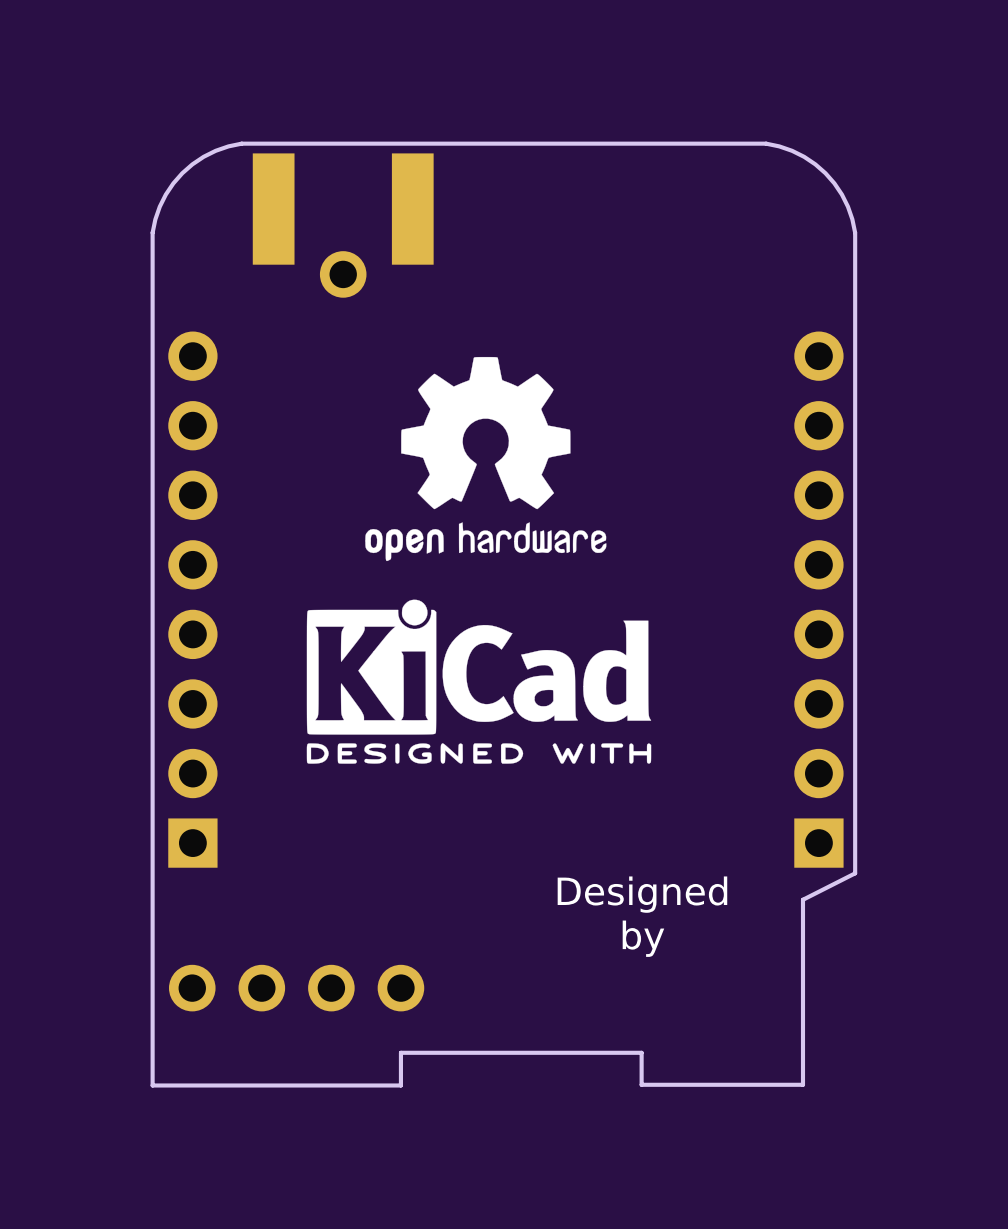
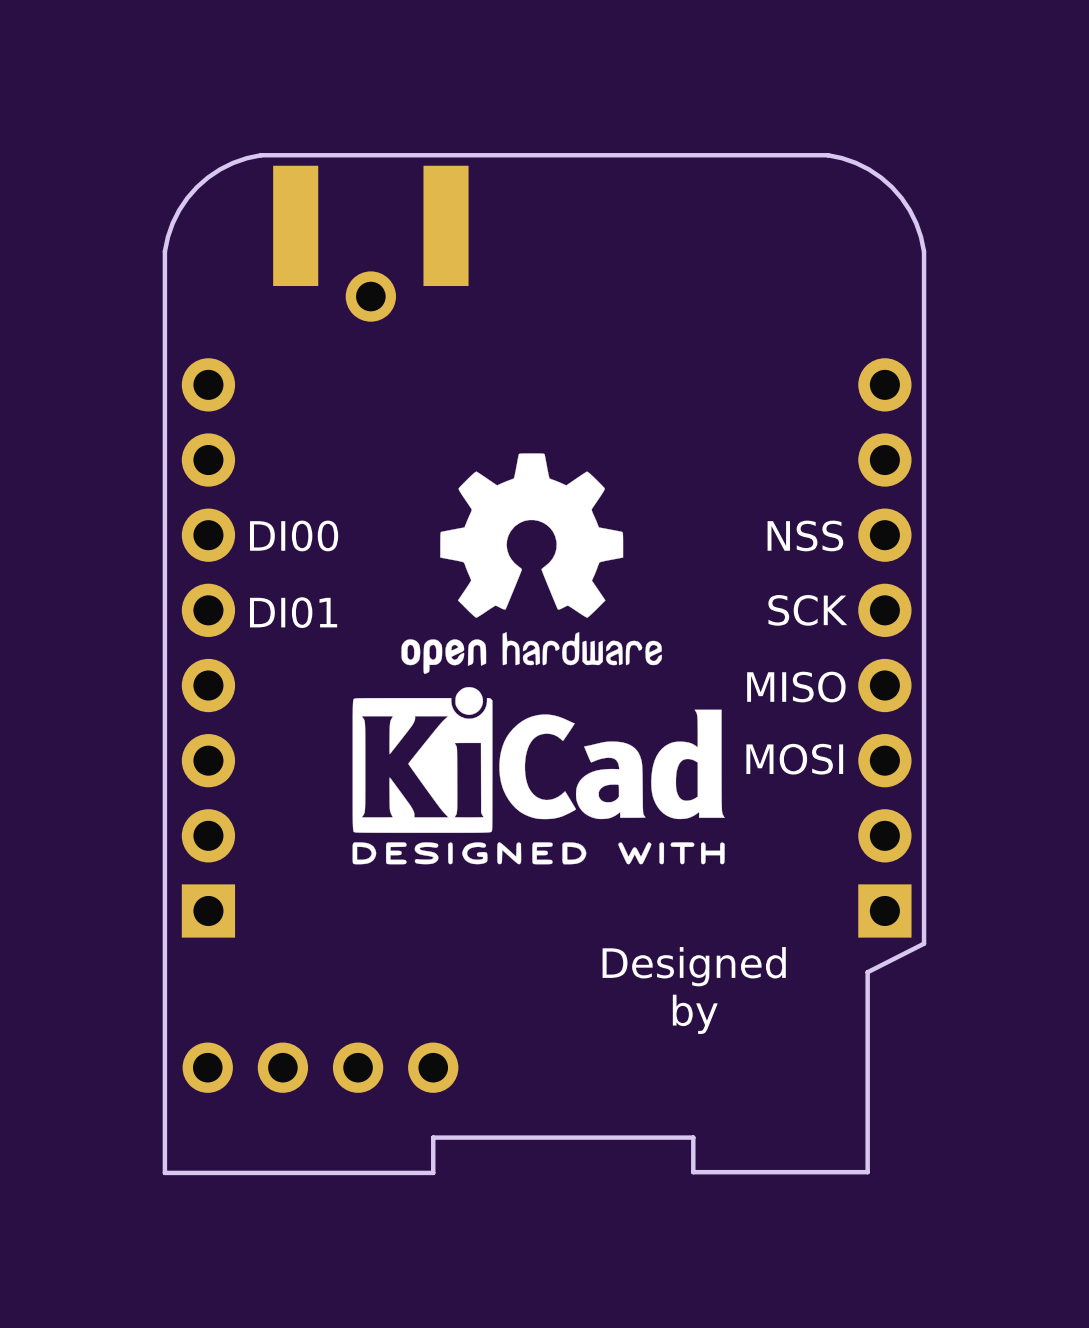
drawing position: (485, 459) -> (531, 563)
text: none -> DI00 (294, 535)
text: none -> NSS (805, 535)
text: none -> SCK (807, 610)
text: none -> DI01 (293, 612)
text: none -> MISO (796, 687)
drawing position: (479, 681) -> (538, 775)
text: none -> MOSI (794, 759)

